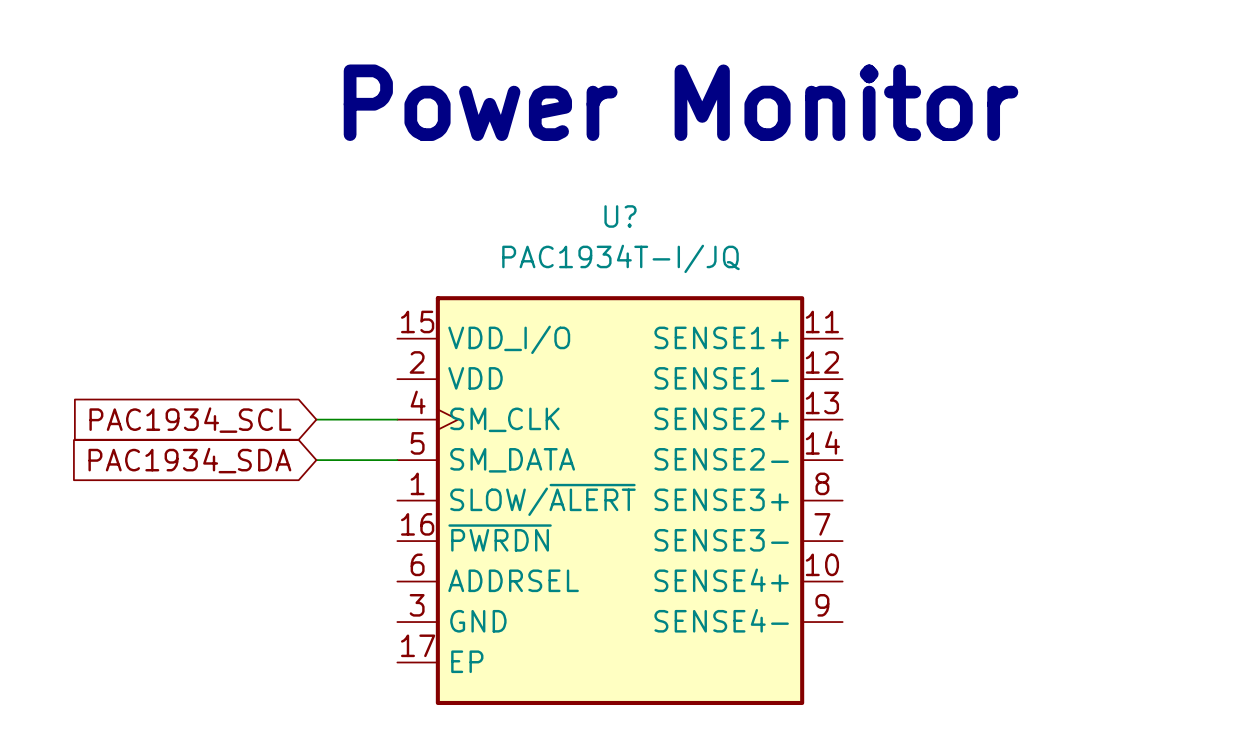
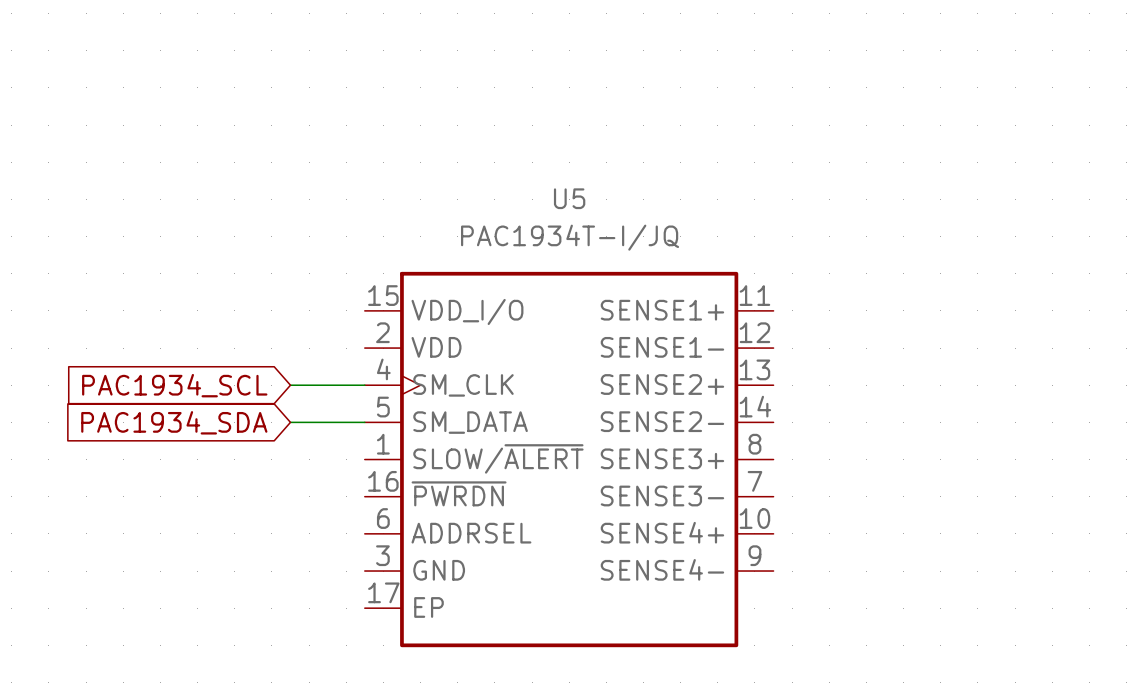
text: Power Monitor (680, 102) -> none
U? name: U? (620, 216) -> U5 (569, 198)

